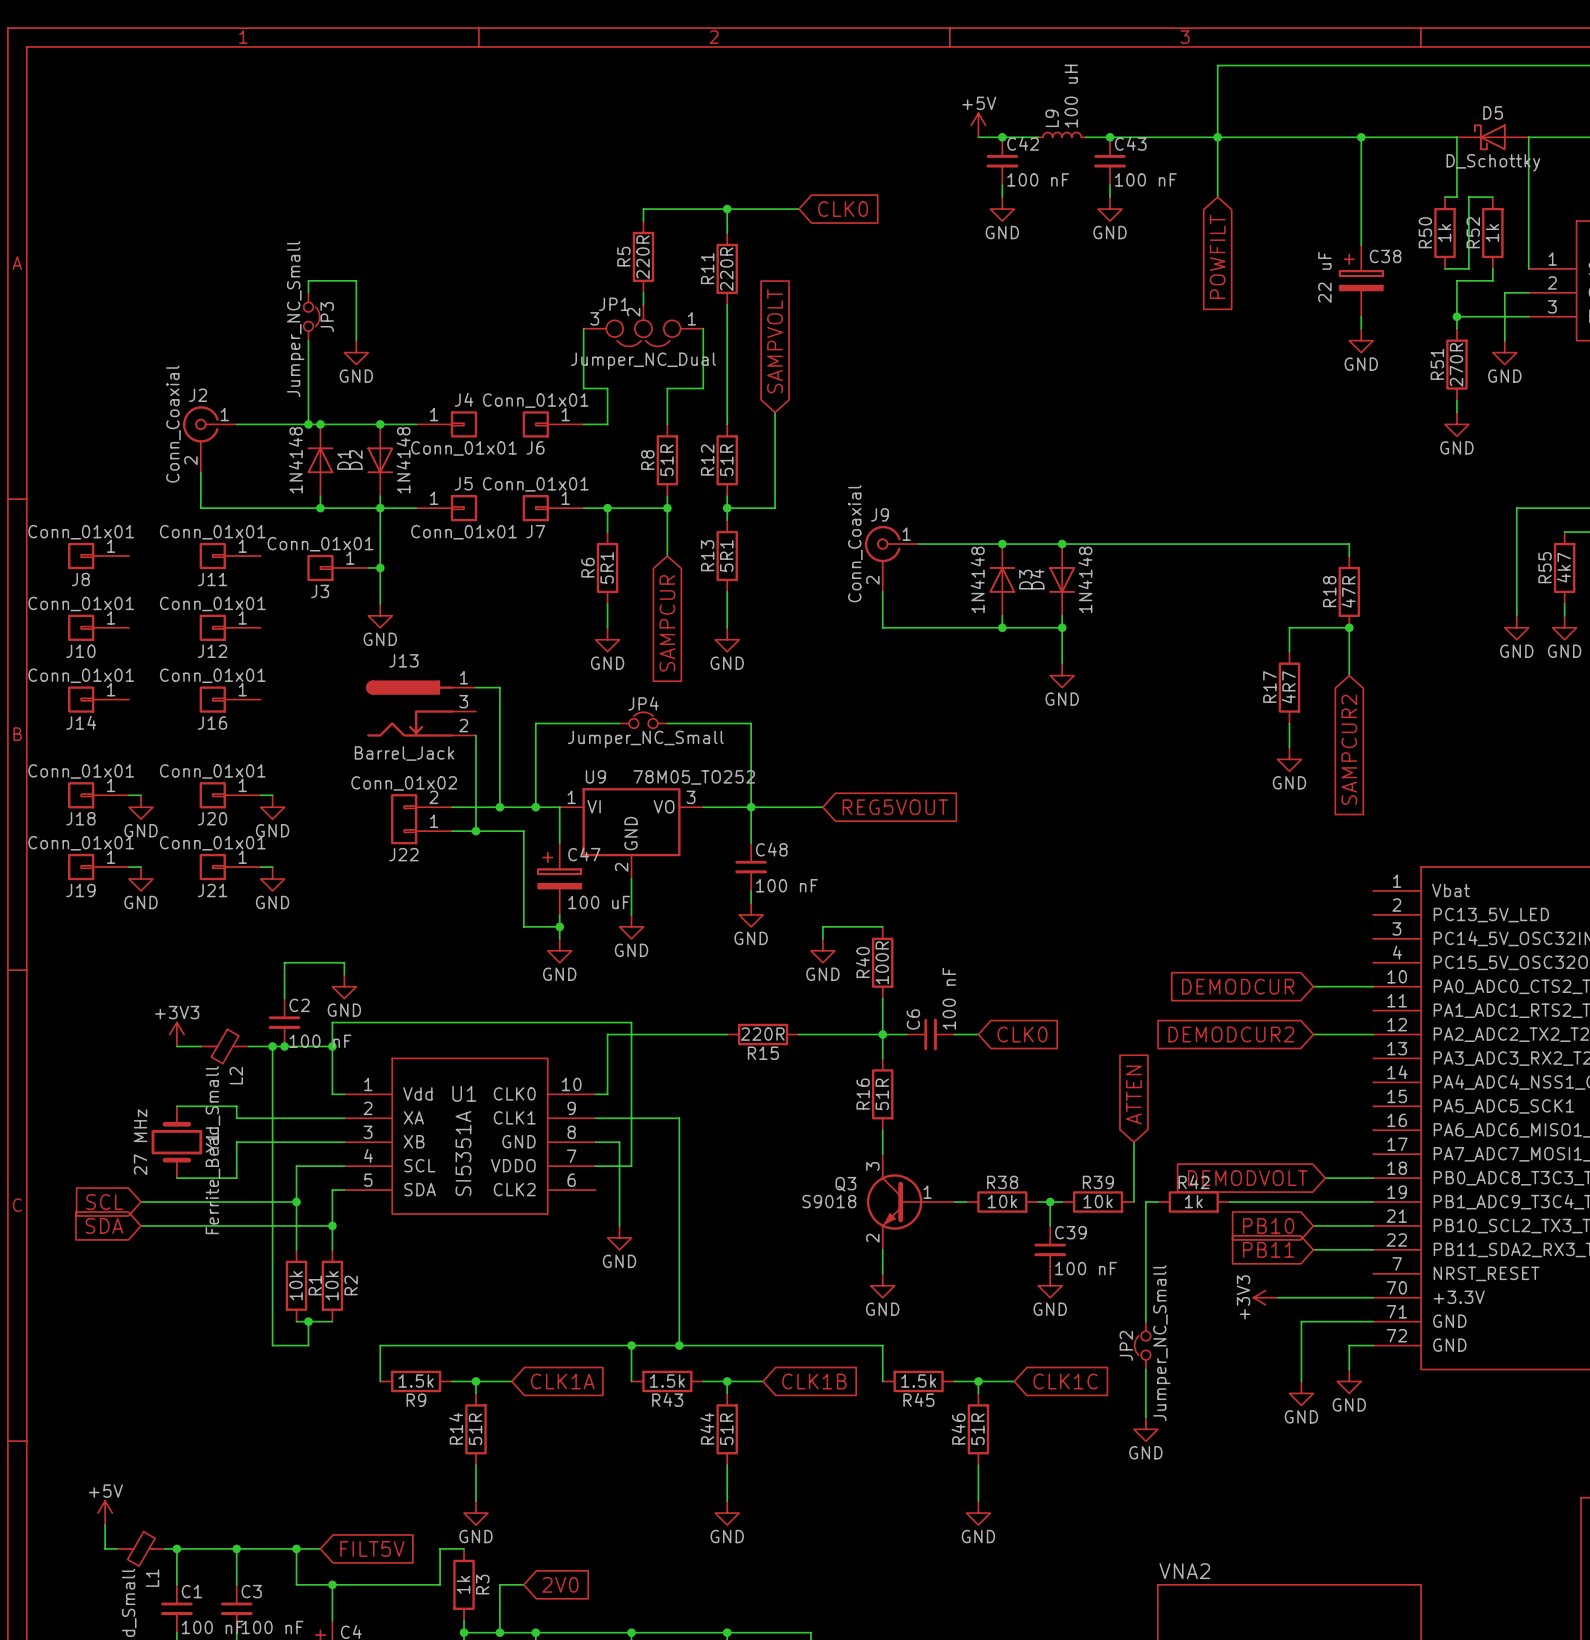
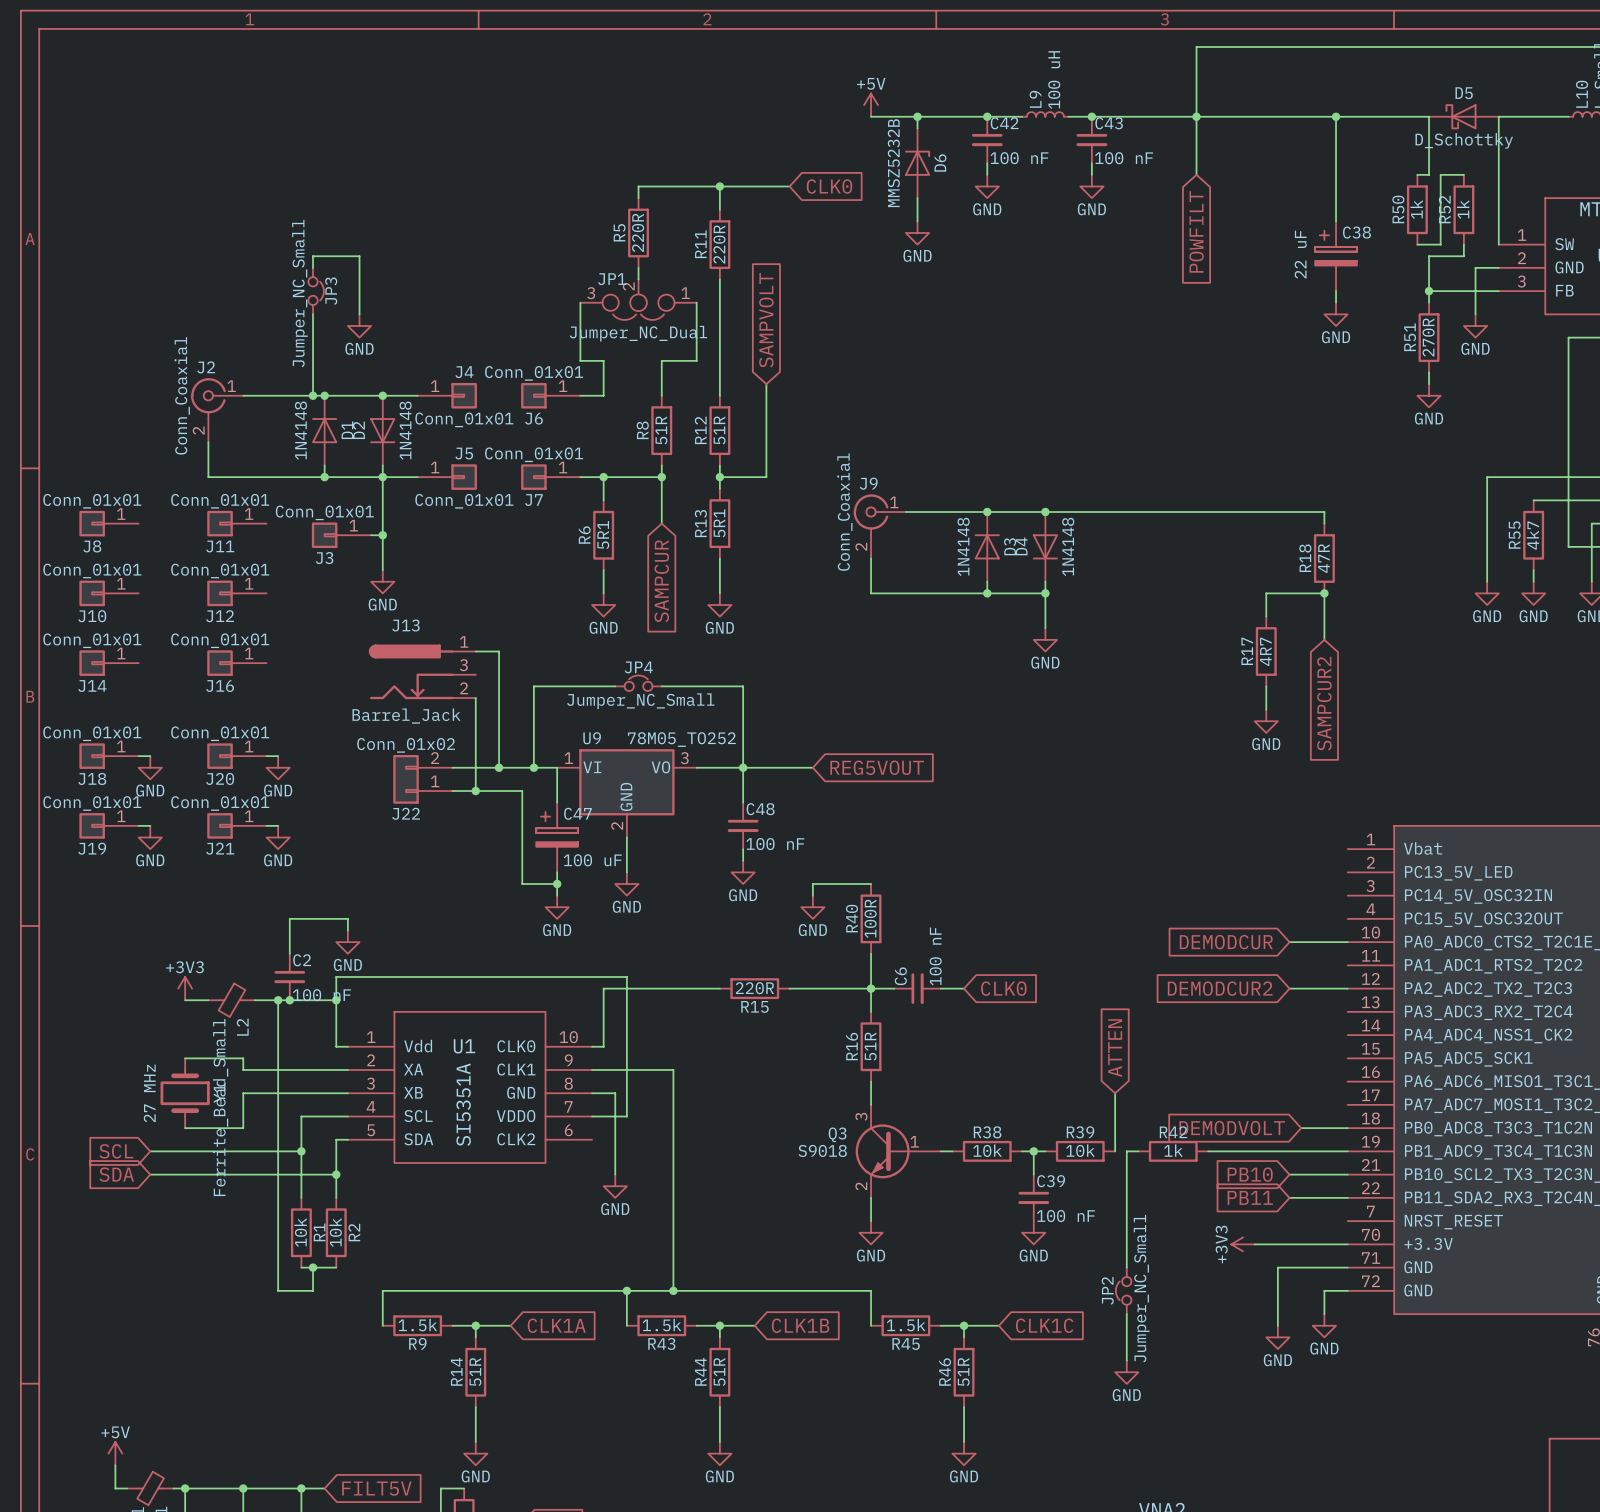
power symbol position: +5V (978, 125) -> +5V (871, 105)
wire: none -> (871, 116) (964, 116)
wire: none -> (917, 116) (917, 128)
junction: none -> (917, 116)
D6: none -> MMSZ5232B (917, 163)
wire: none -> (917, 198) (917, 221)
power symbol: none -> GND (917, 233)

